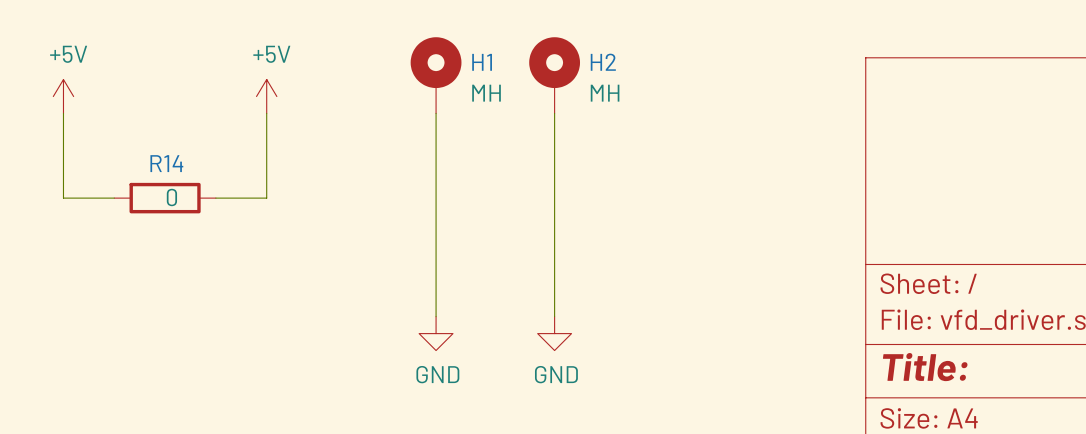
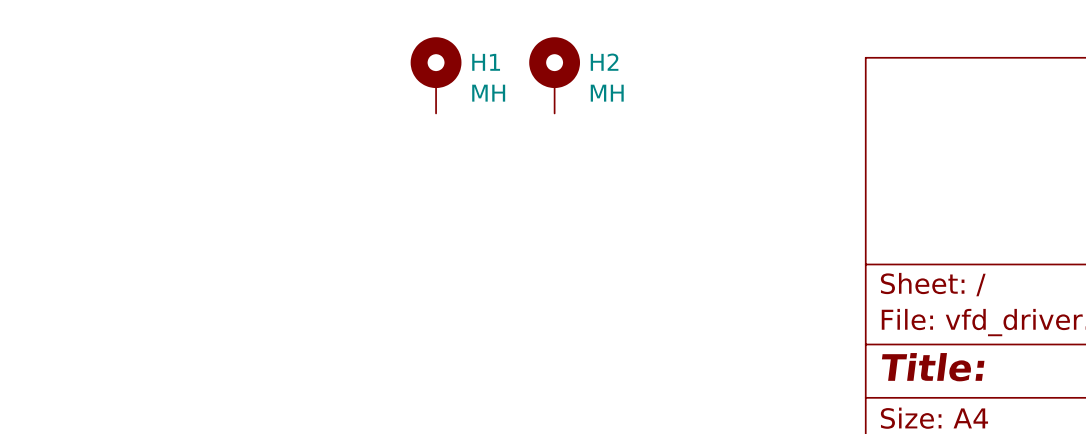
power symbol: +5V (63, 96) -> none
power symbol: +5V (266, 96) -> none
wire: (63, 113) (63, 198) (114, 198) -> none
wire: (266, 113) (266, 198) (215, 198) -> none
wire: (436, 113) (436, 316) -> none
wire: (554, 113) (554, 316) -> none
R14: 0 (165, 198) -> none
power symbol: GND (436, 333) -> none
power symbol: GND (554, 333) -> none

